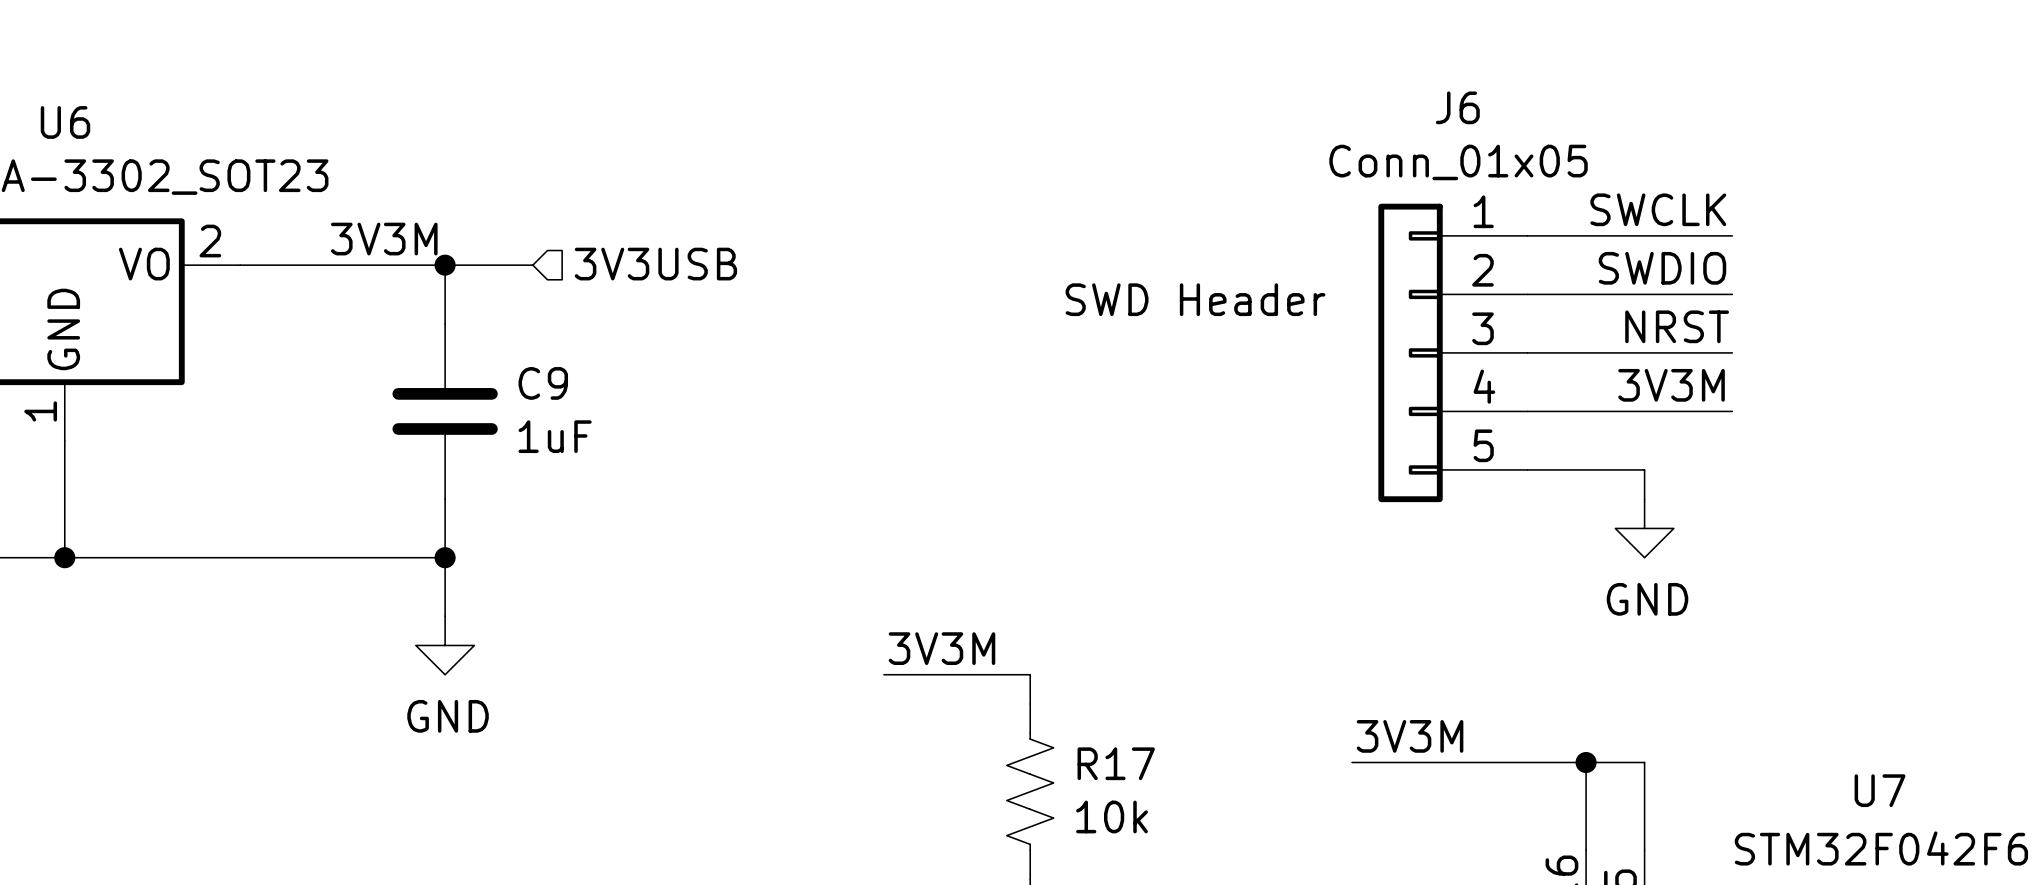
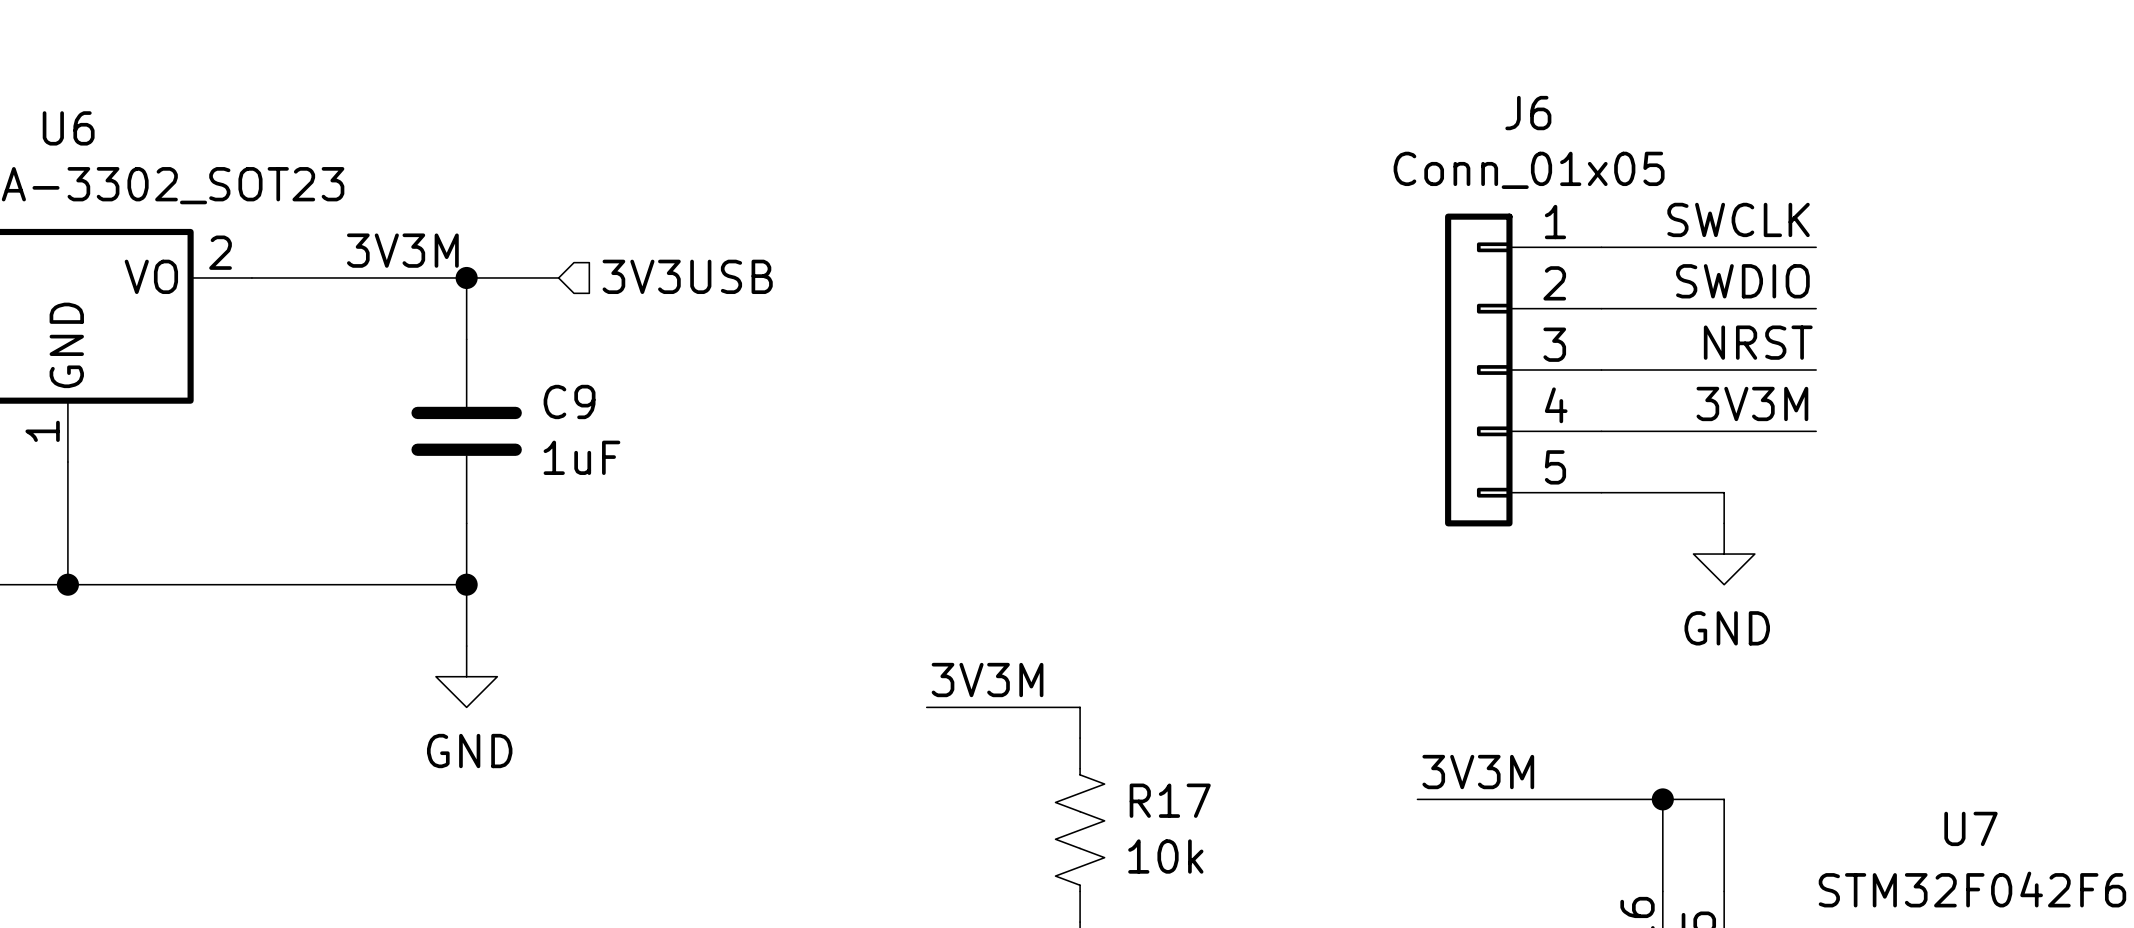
text: SWD Header (1195, 299) -> none

